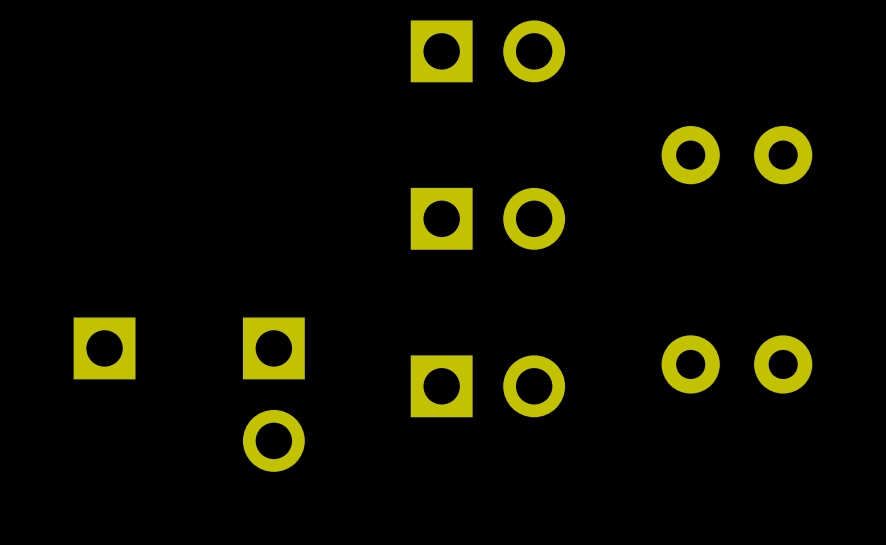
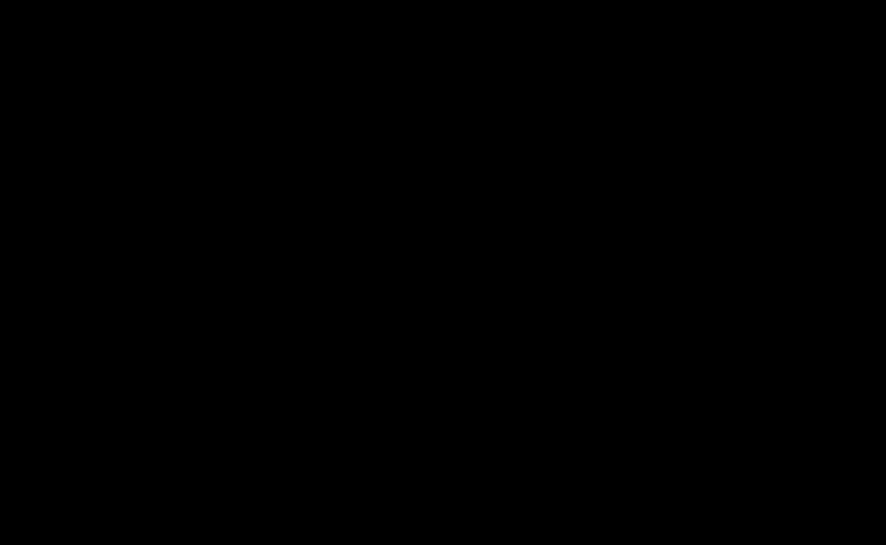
part: (487, 51) -> none
part: (736, 155) -> none
part: (487, 218) -> none
part: (104, 348) -> none
part: (736, 364) -> none
part: (487, 386) -> none
part: (273, 394) -> none

